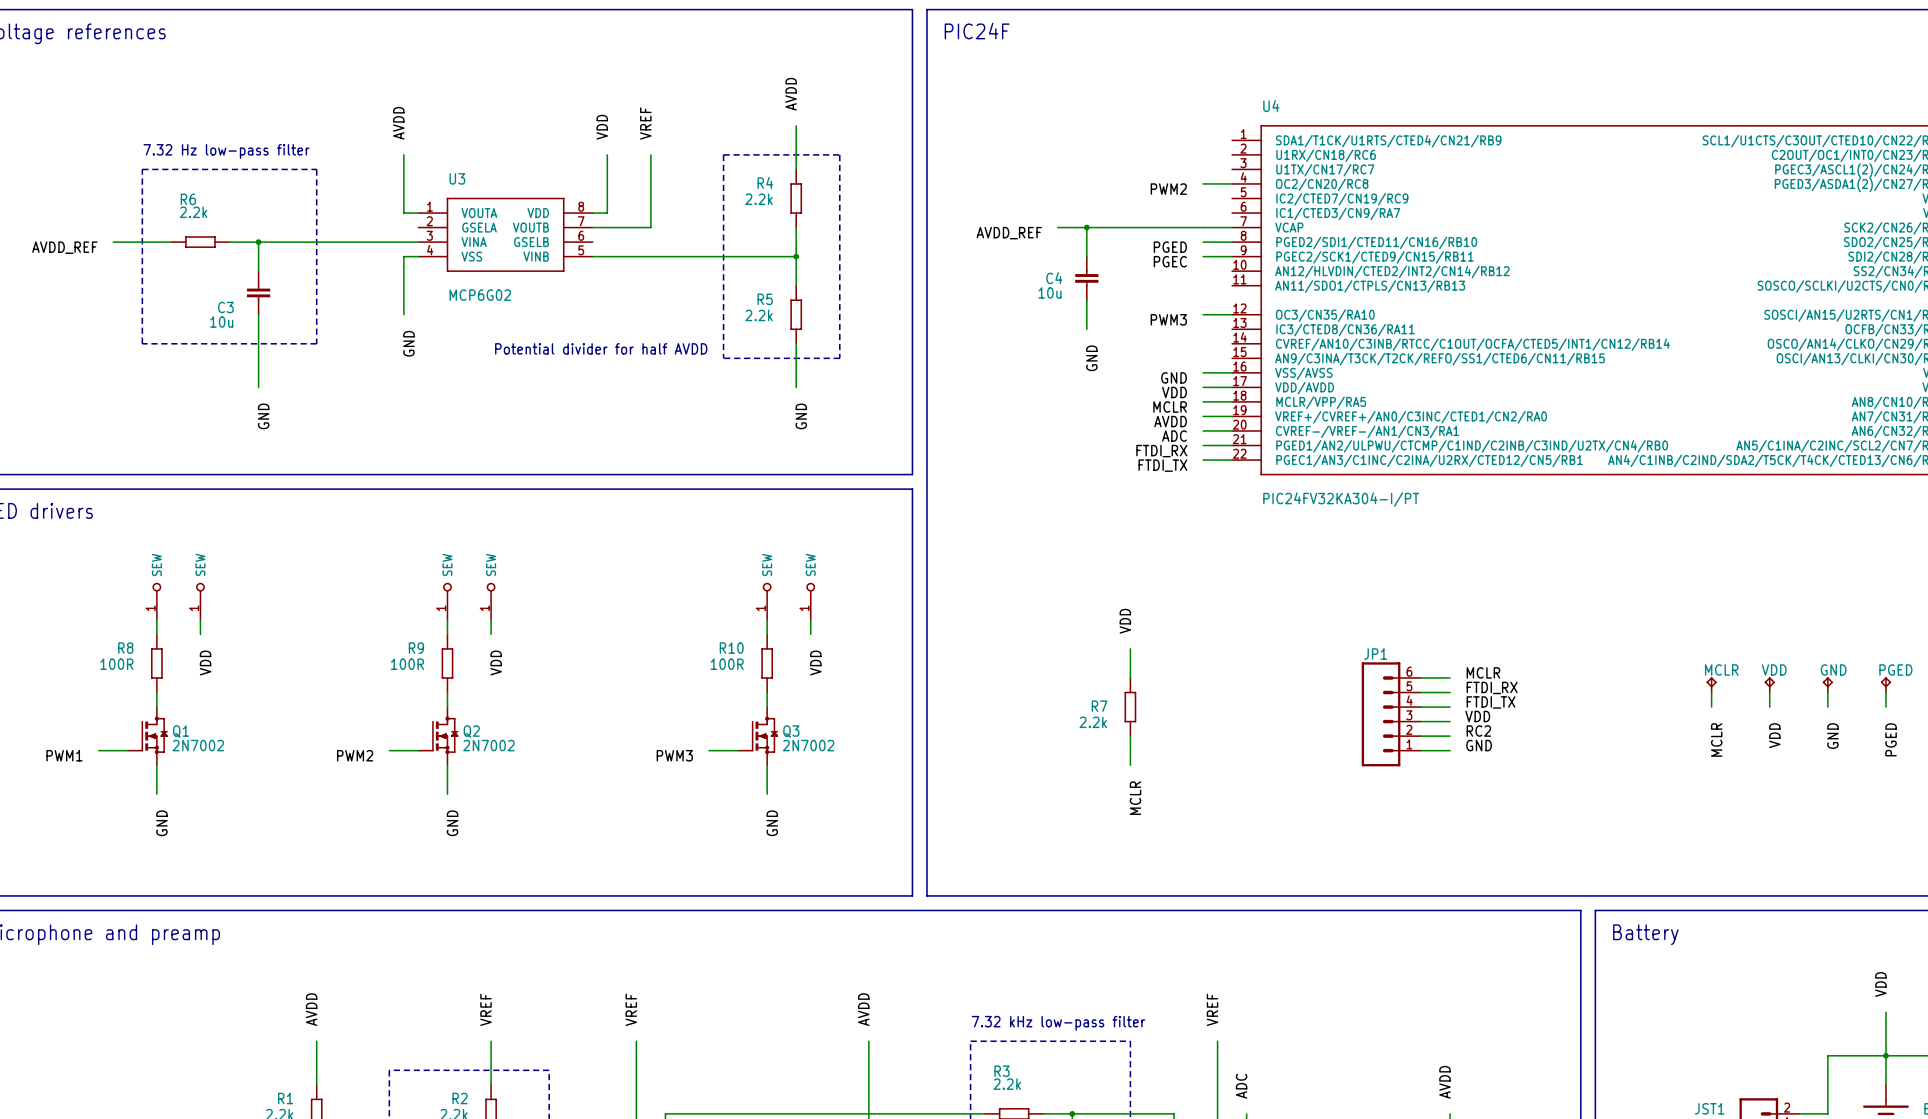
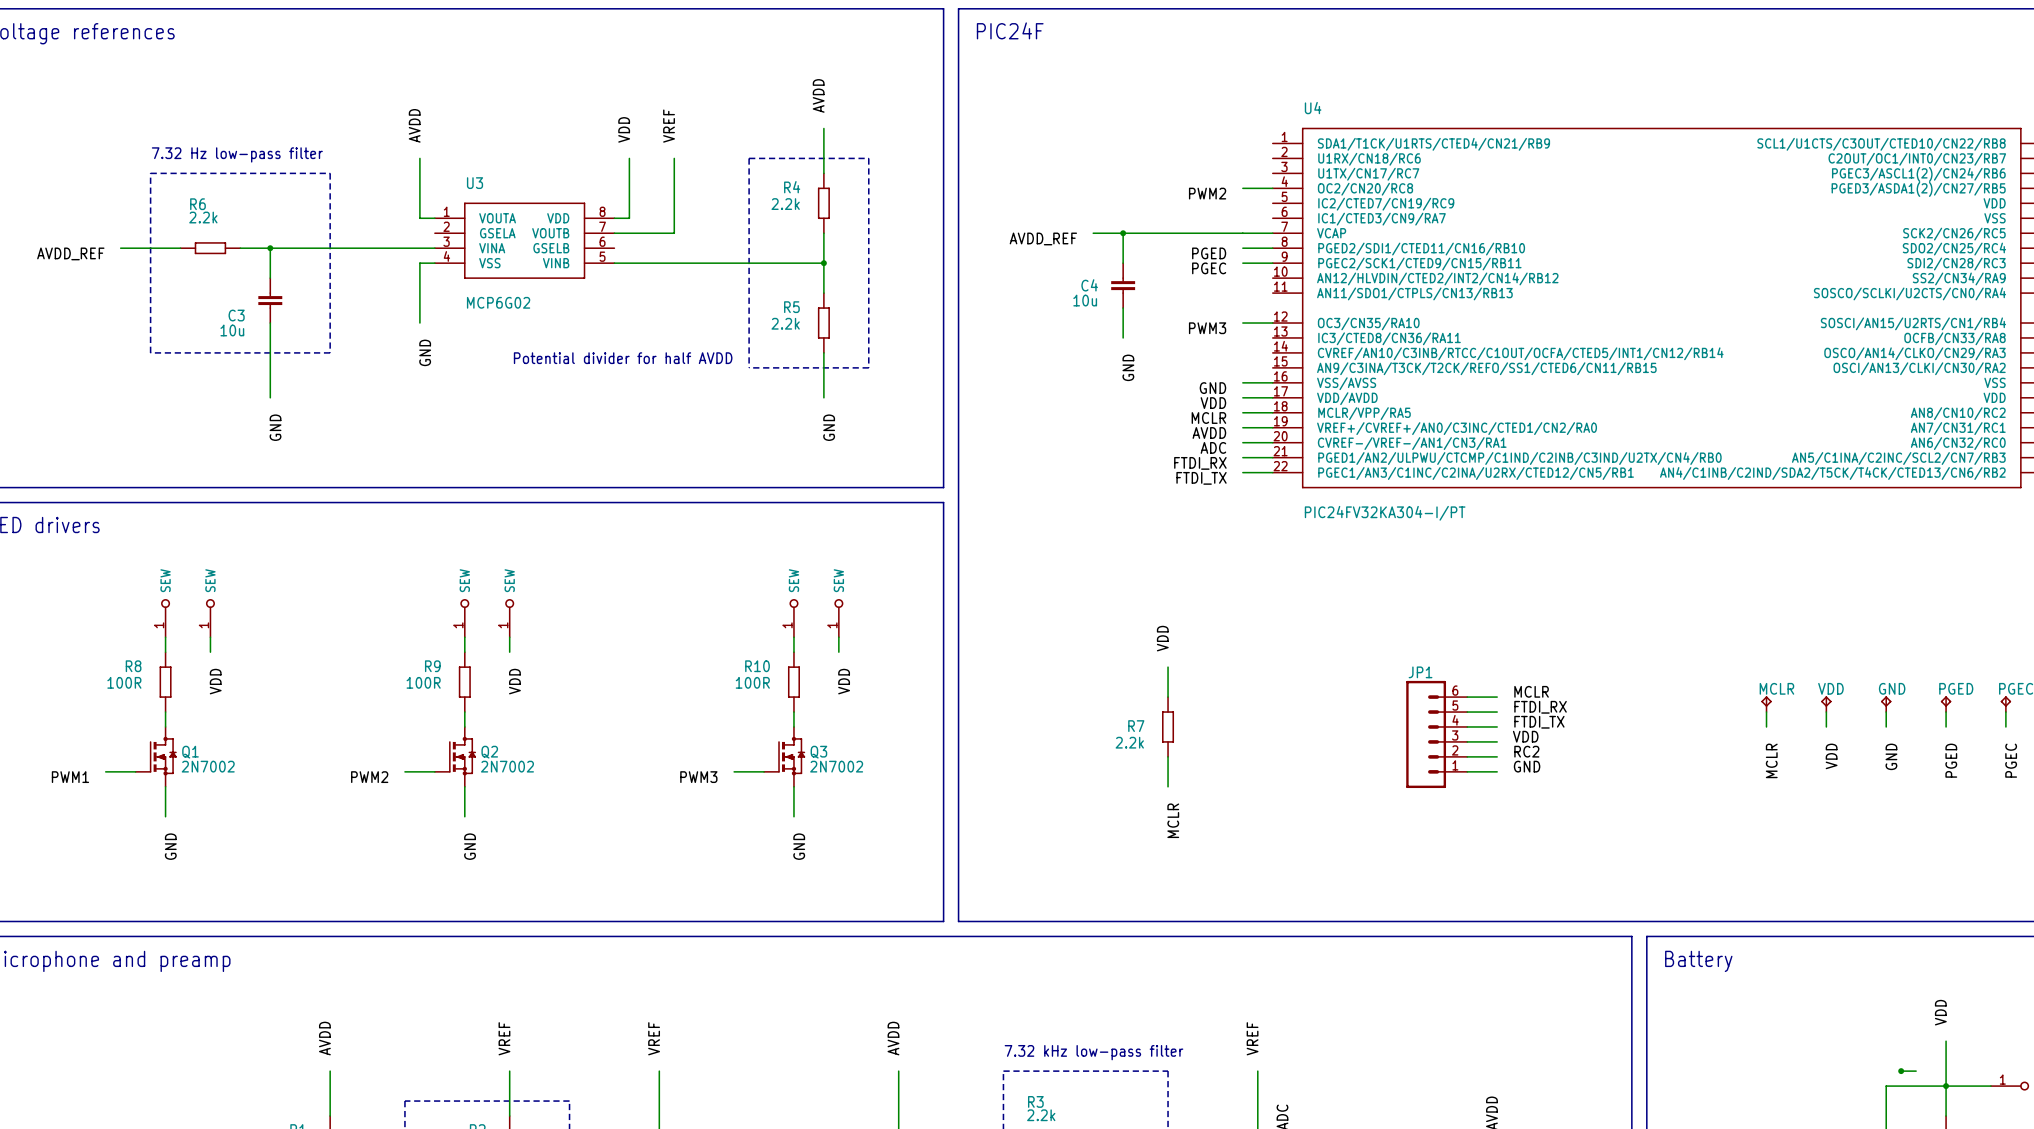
wire: none -> (1901, 1071) (1916, 1071)
junction: none -> (1901, 1071)

